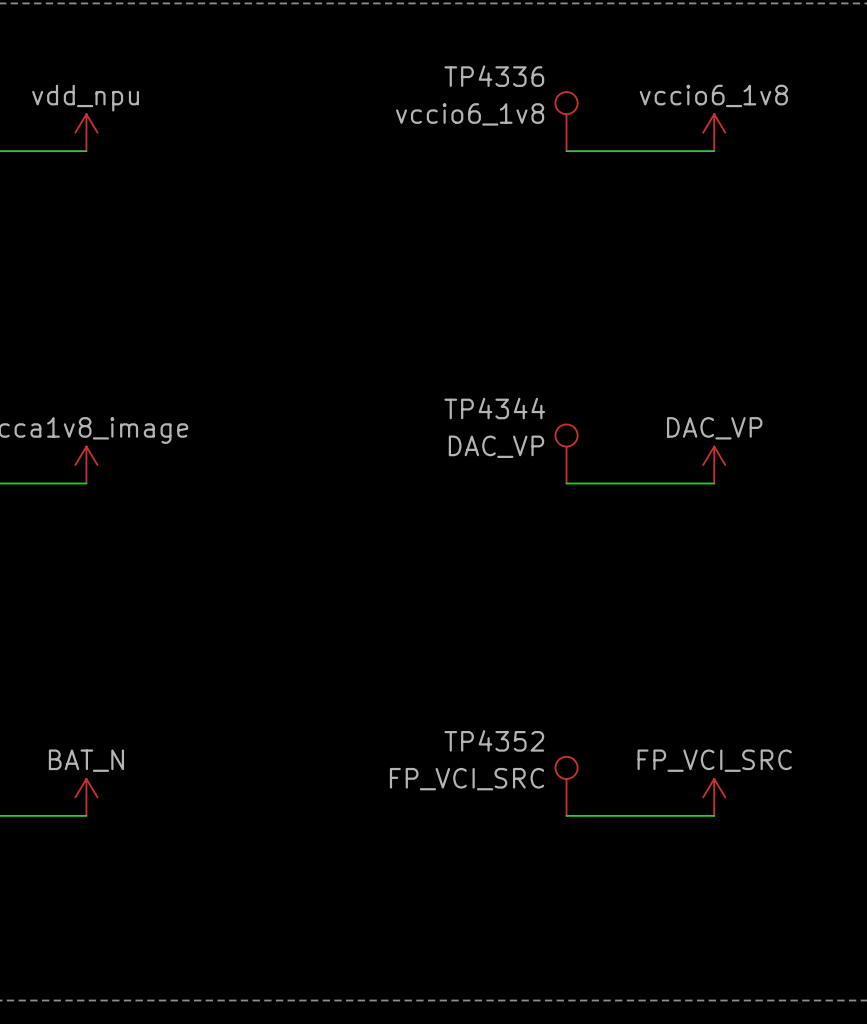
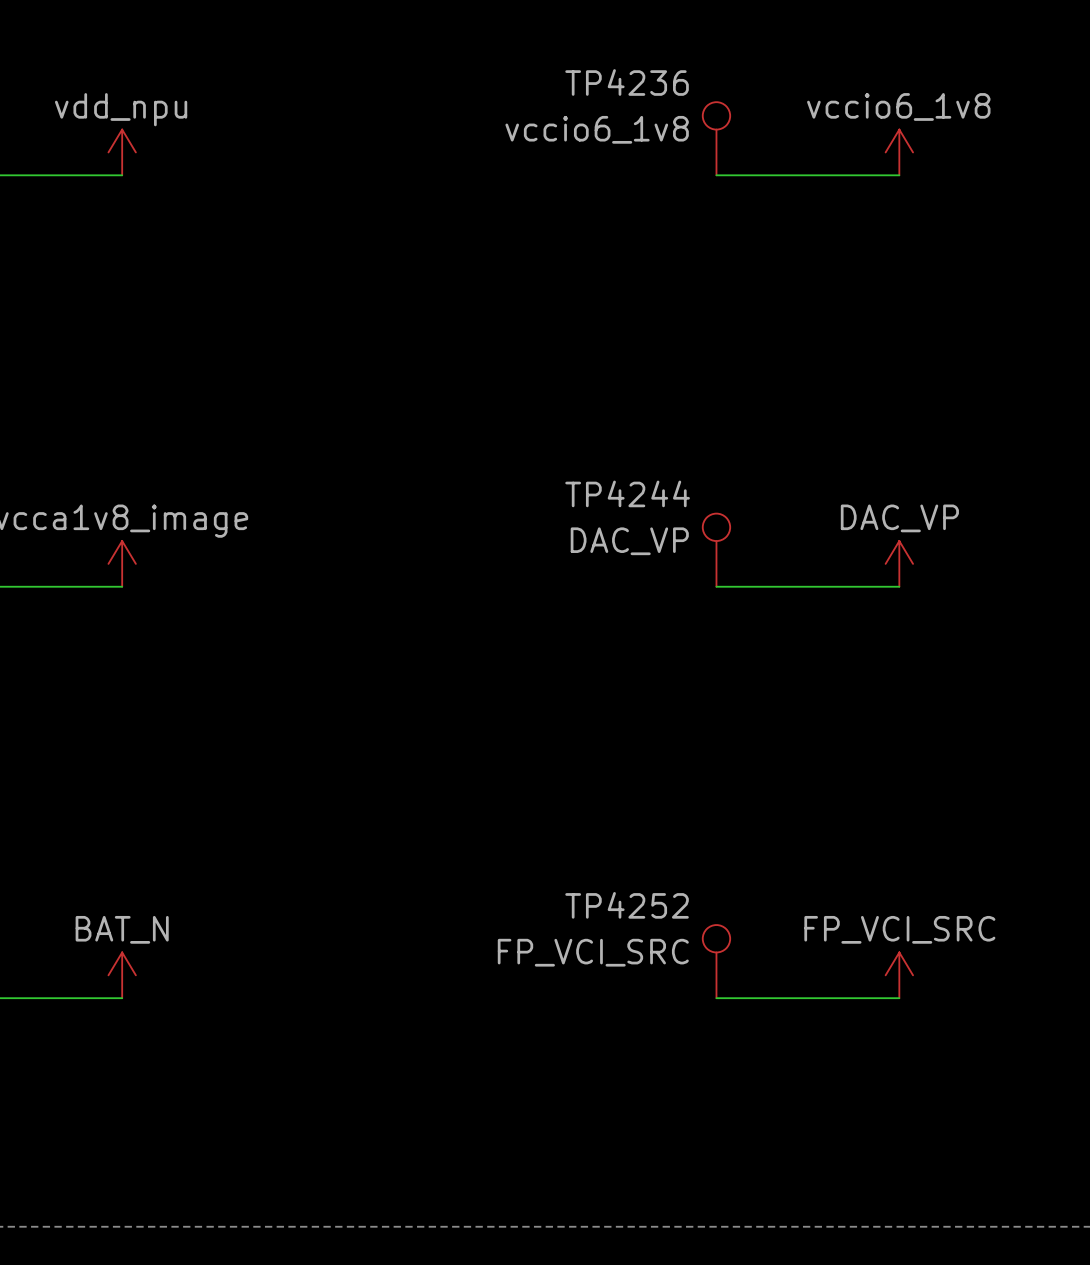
TP4336 name: TP4336 (494, 76) -> TP4236 (627, 82)
TP4344 name: TP4344 (494, 408) -> TP4244 (627, 493)
TP4352 name: TP4352 (494, 740) -> TP4252 (627, 905)

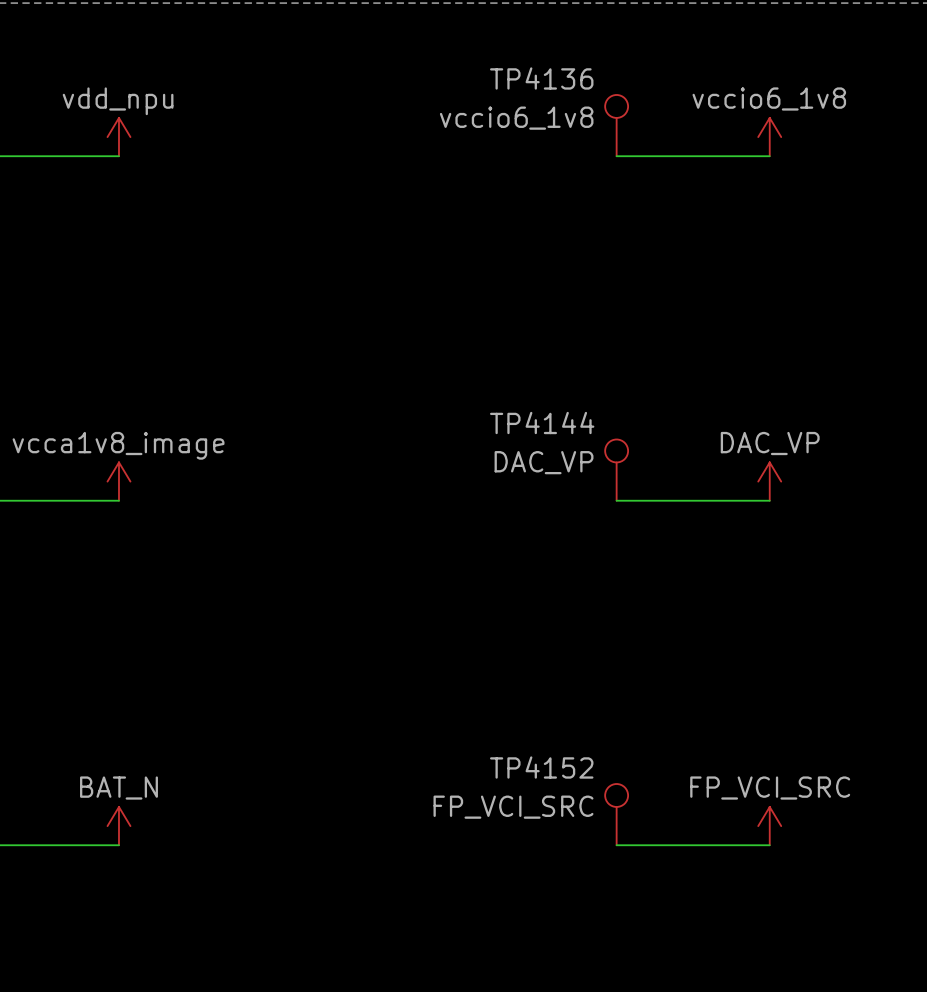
TP4236 name: TP4236 (627, 82) -> TP4136 (541, 78)
TP4244 name: TP4244 (627, 493) -> TP4144 (542, 423)
TP4252 name: TP4252 (627, 905) -> TP4152 (541, 767)

